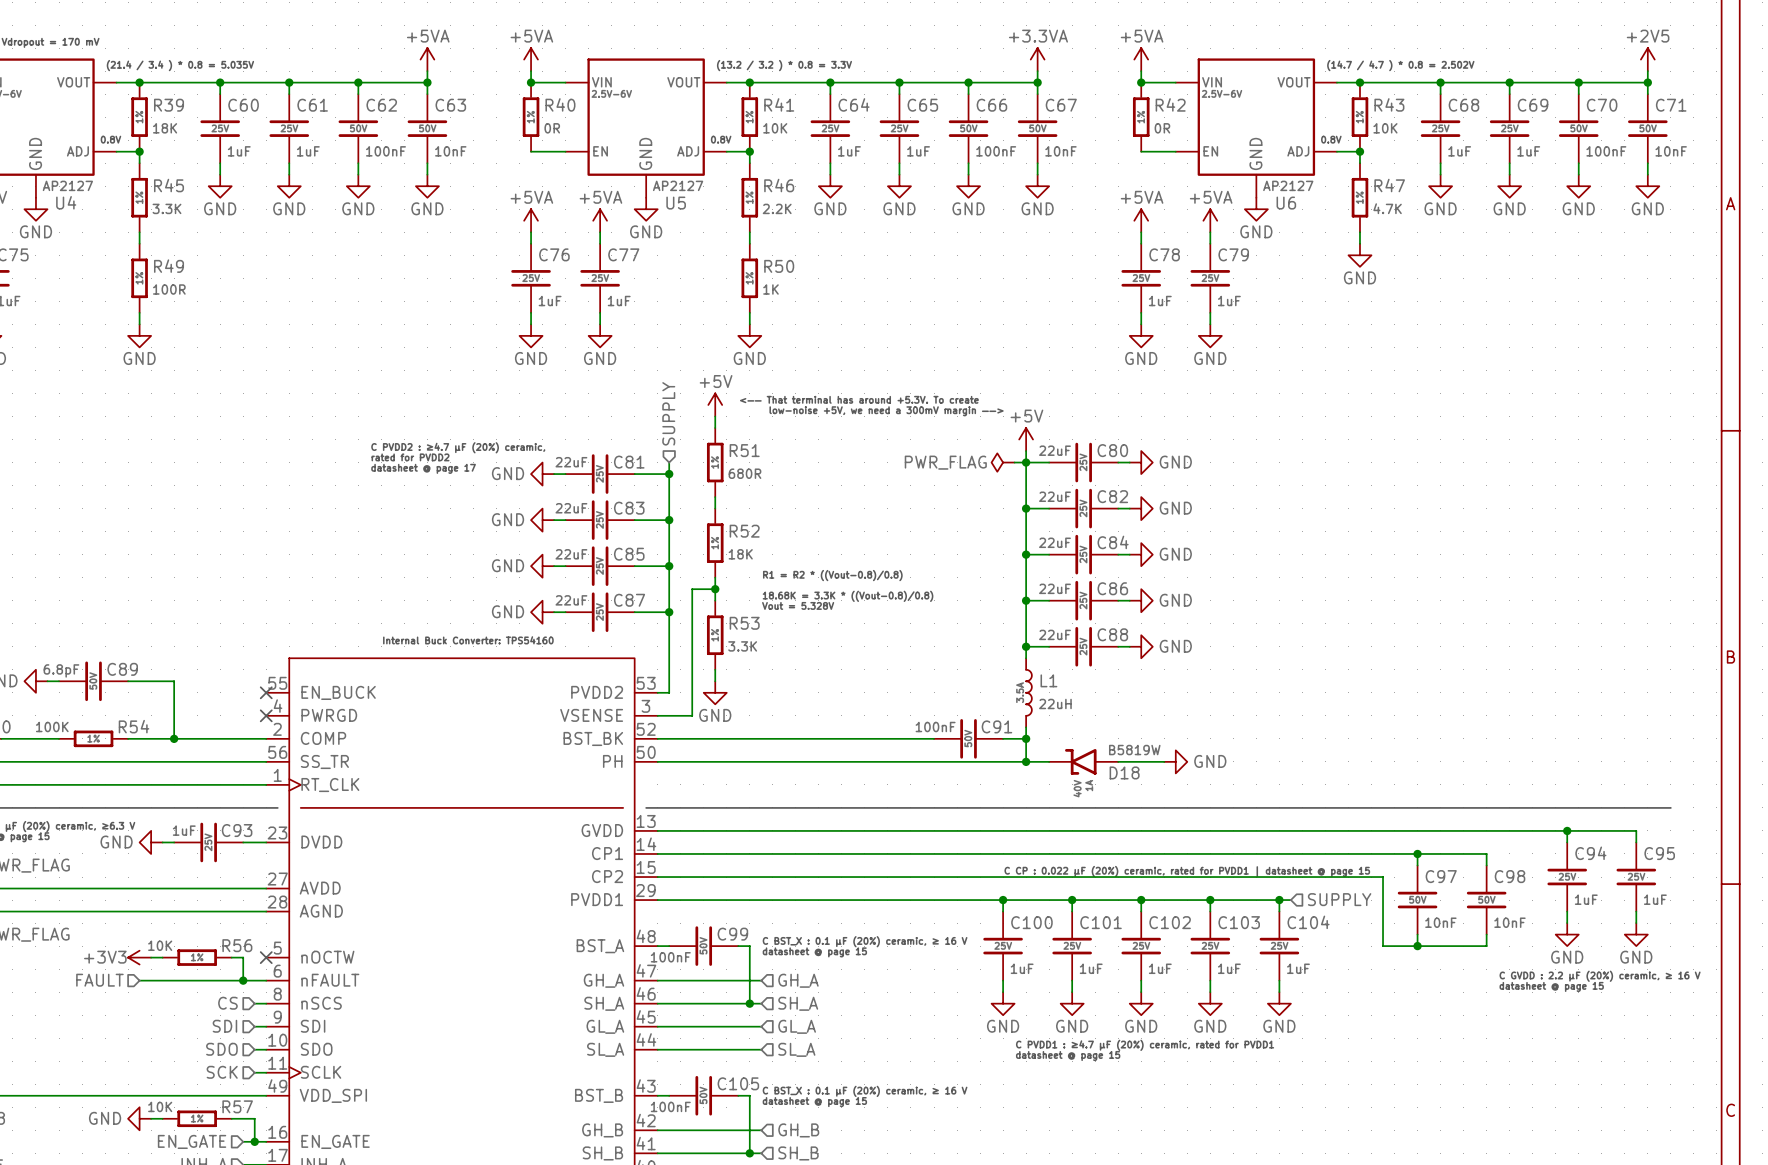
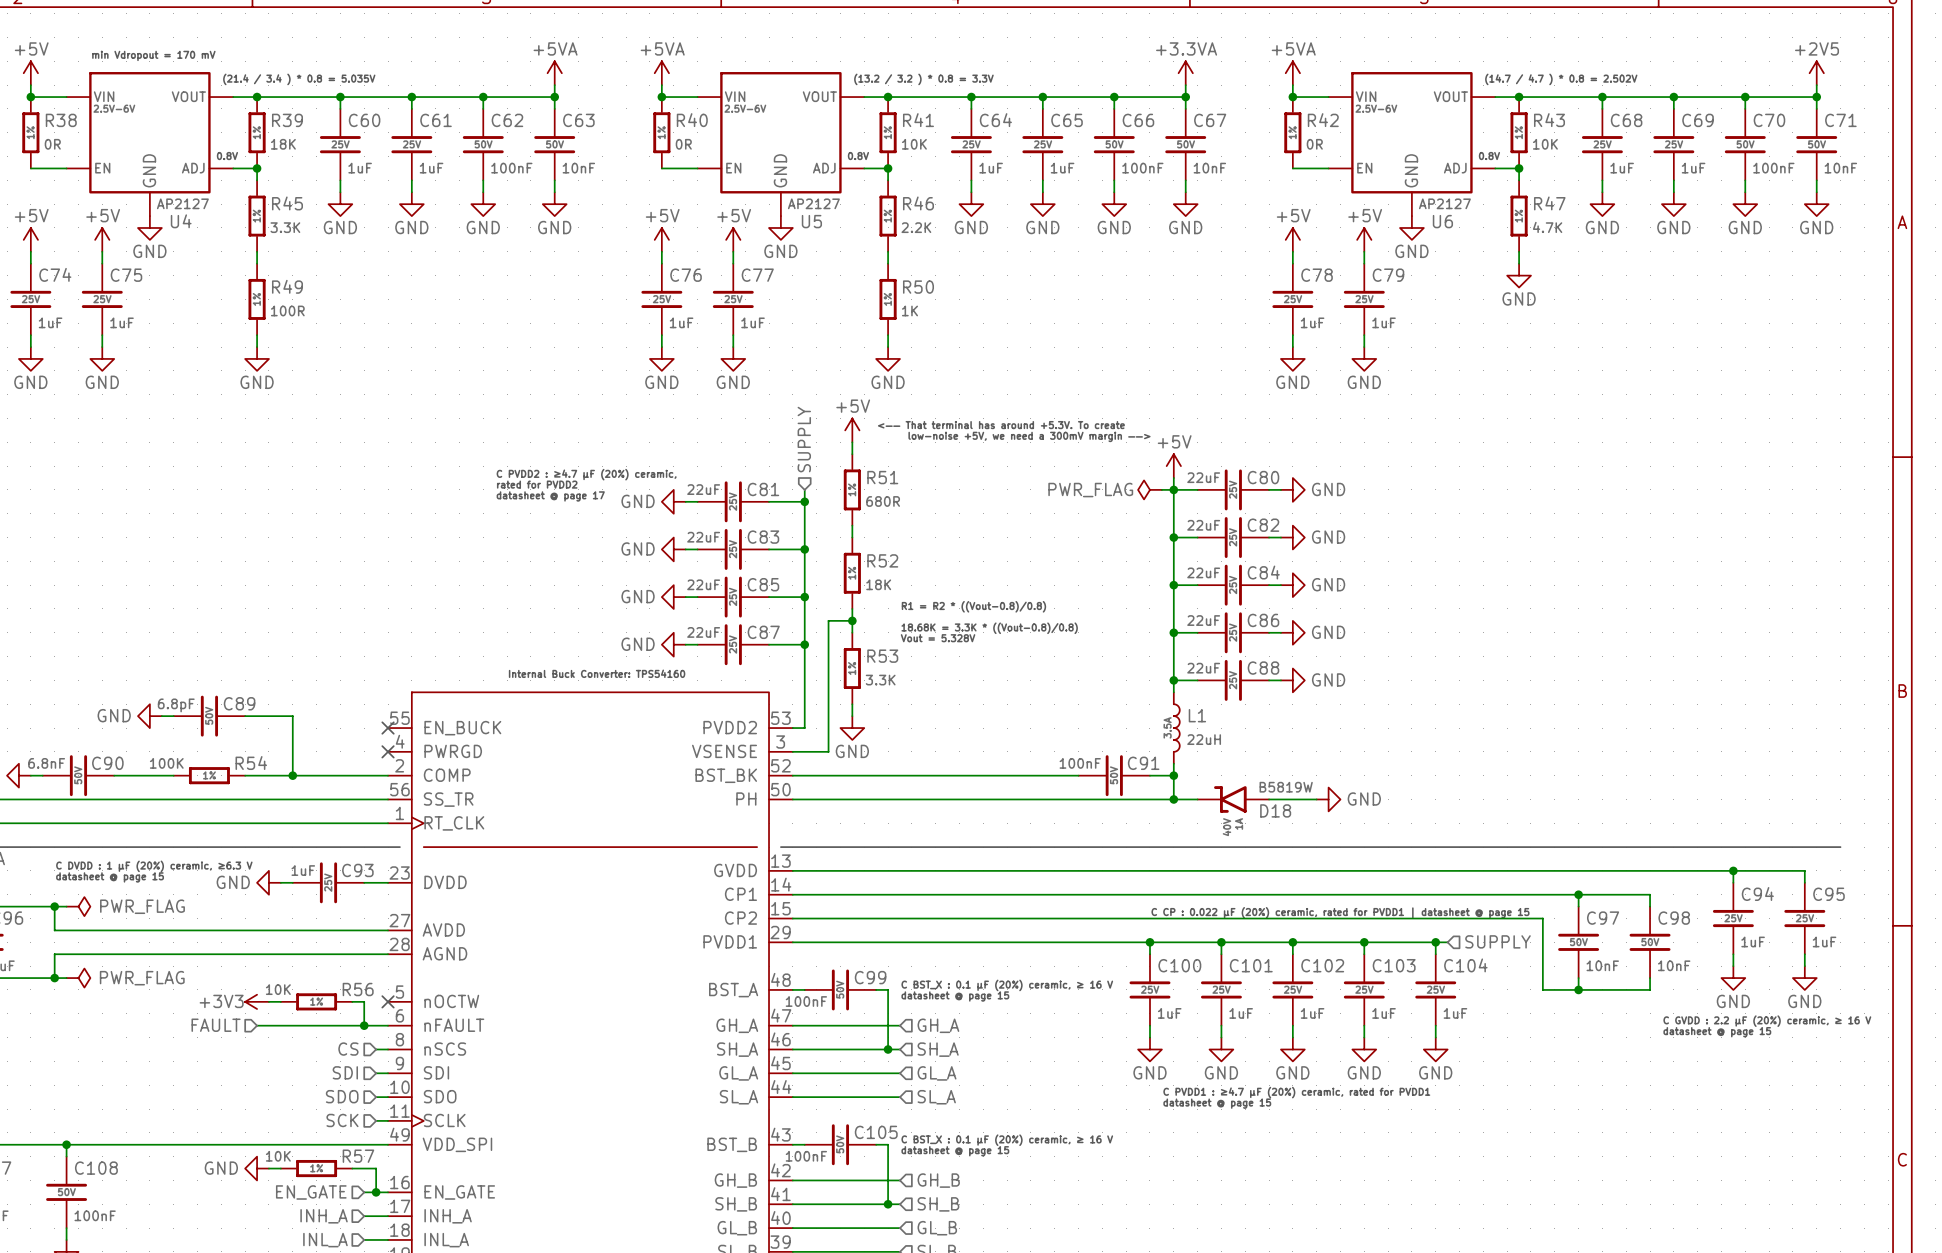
power symbol: +5VA (531, 220) -> +5V (661, 239)
power symbol: +5VA (600, 220) -> +5V (733, 239)
power symbol: +5VA (1141, 220) -> +5V (1292, 239)
power symbol: +5VA (1210, 220) -> +5V (1364, 239)

